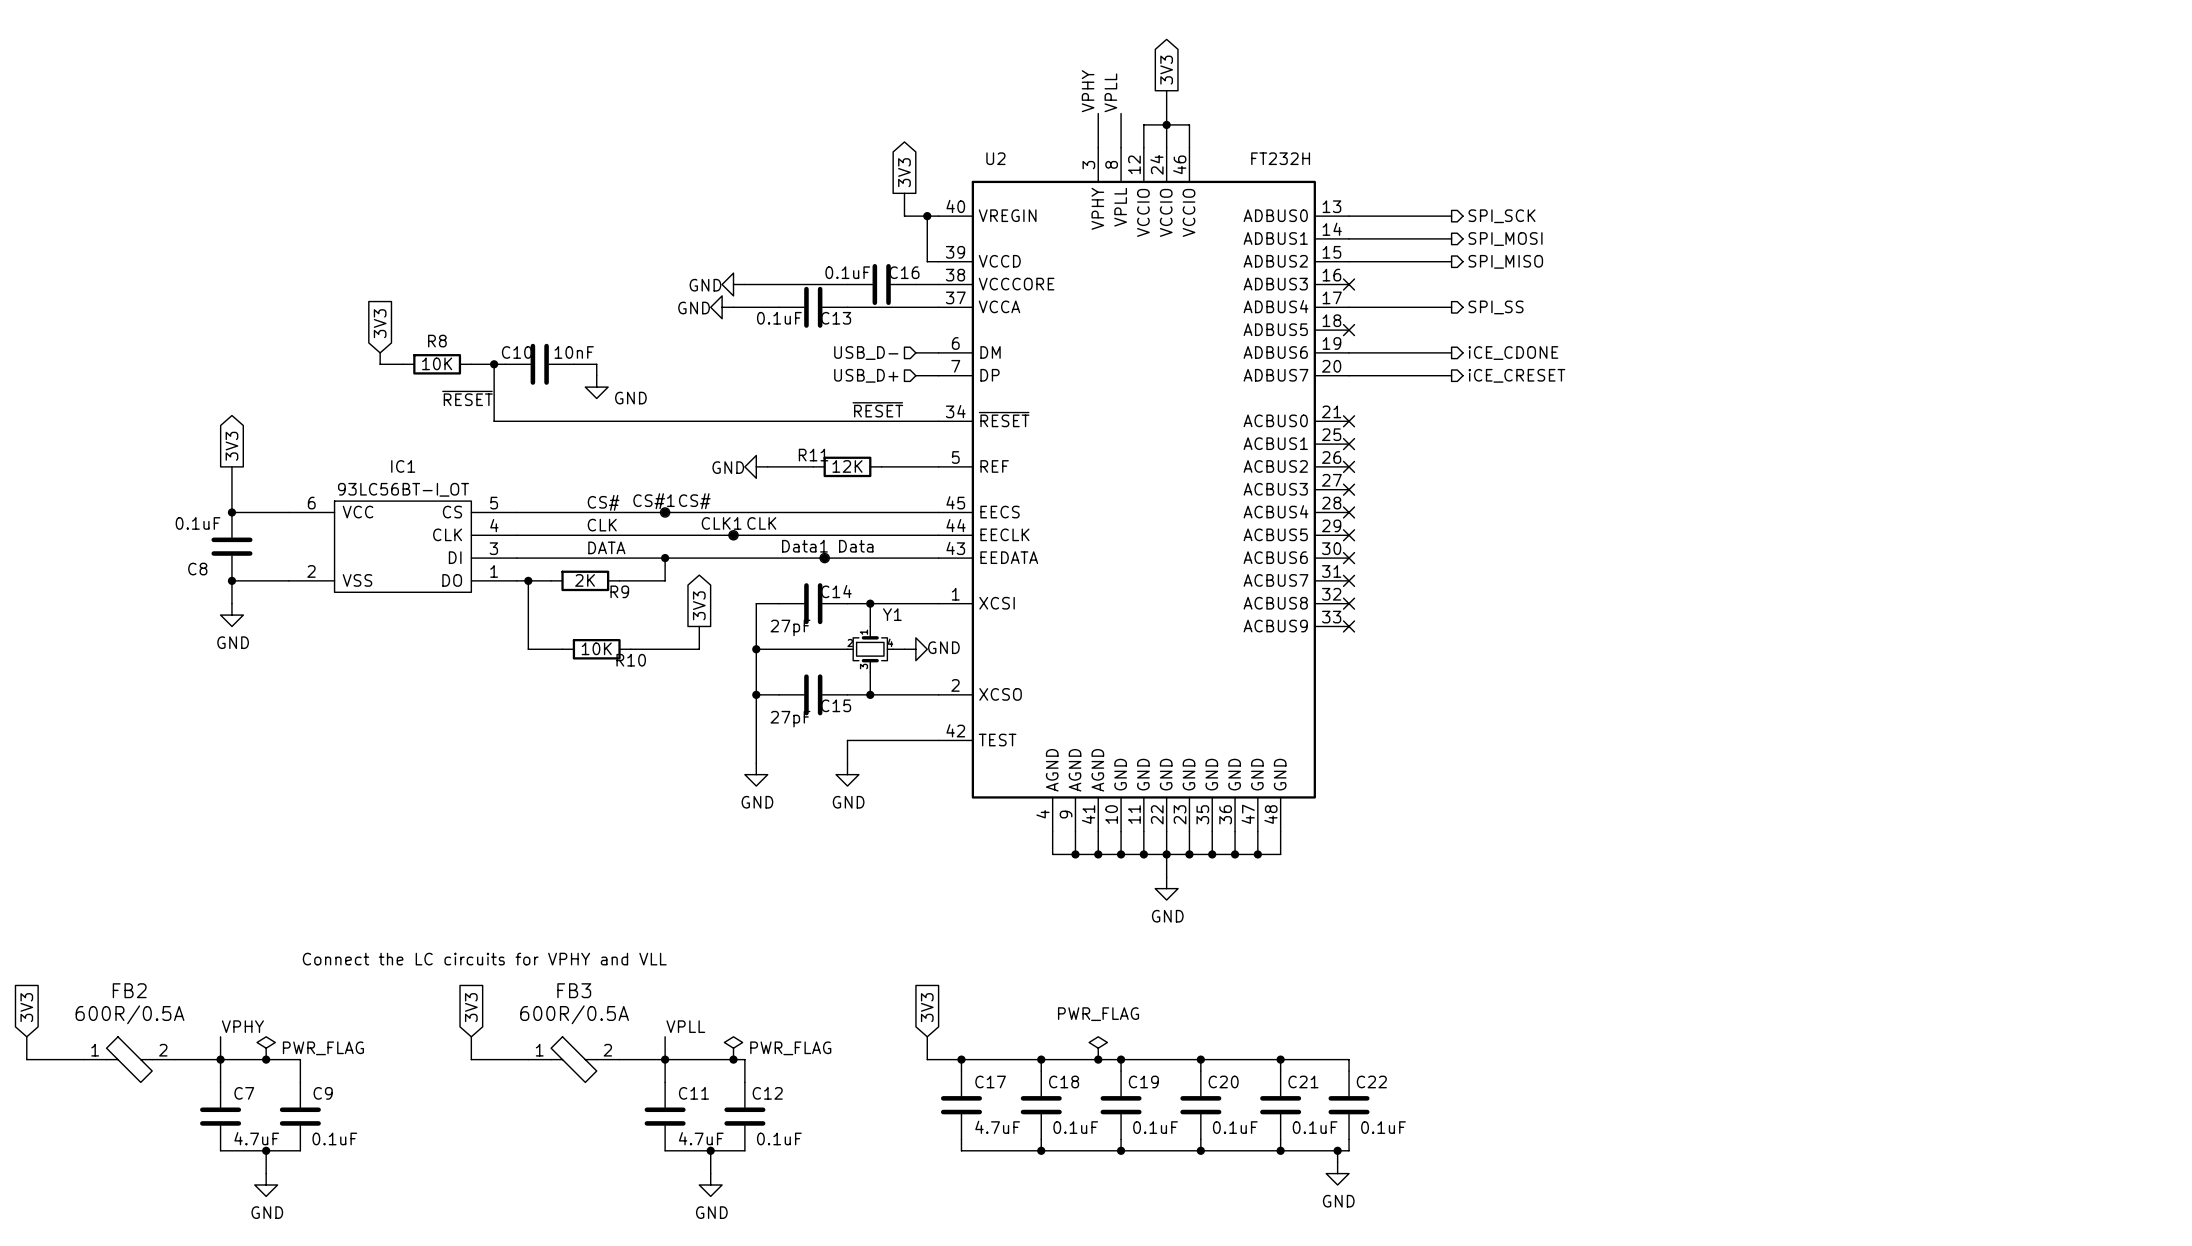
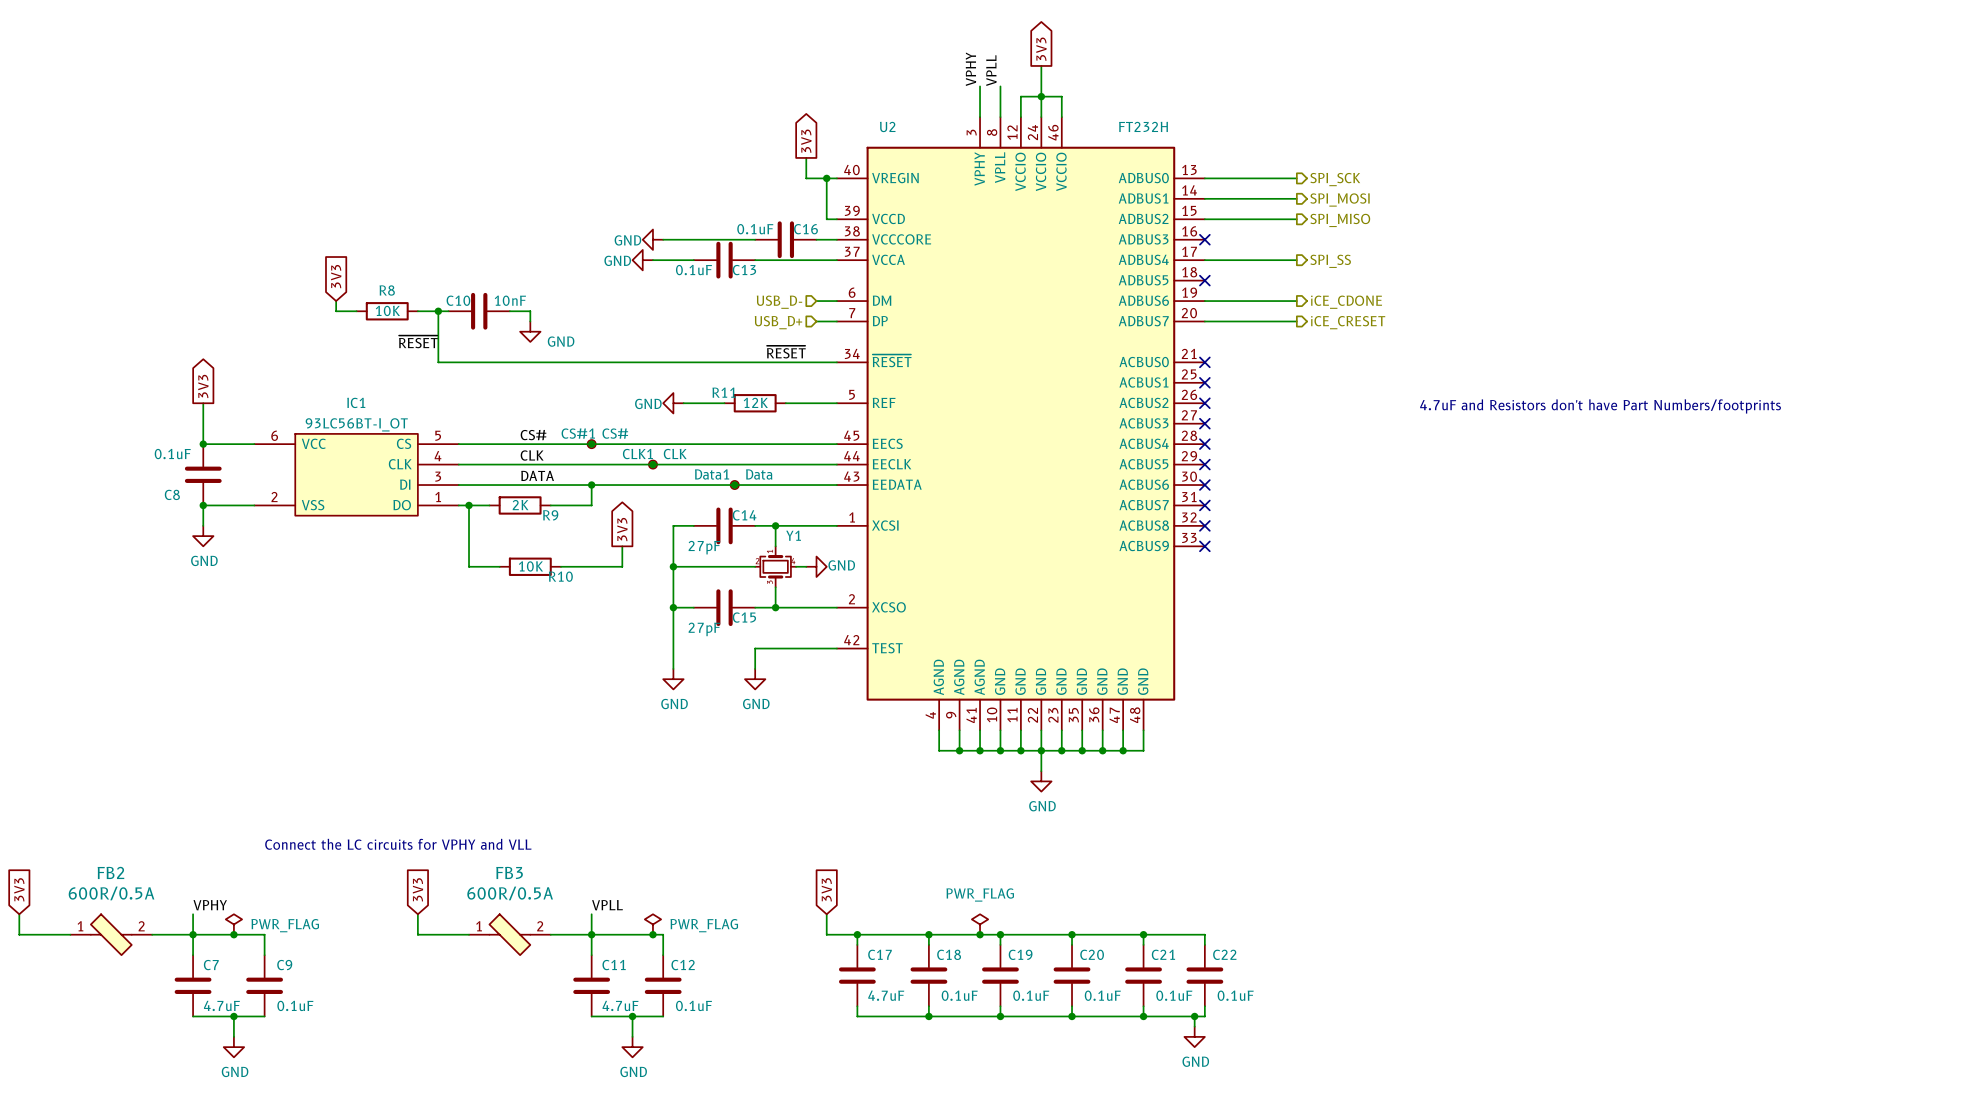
text: none -> 4.7uF and Resistors don't have Part Numbers/footprints (1600, 406)

